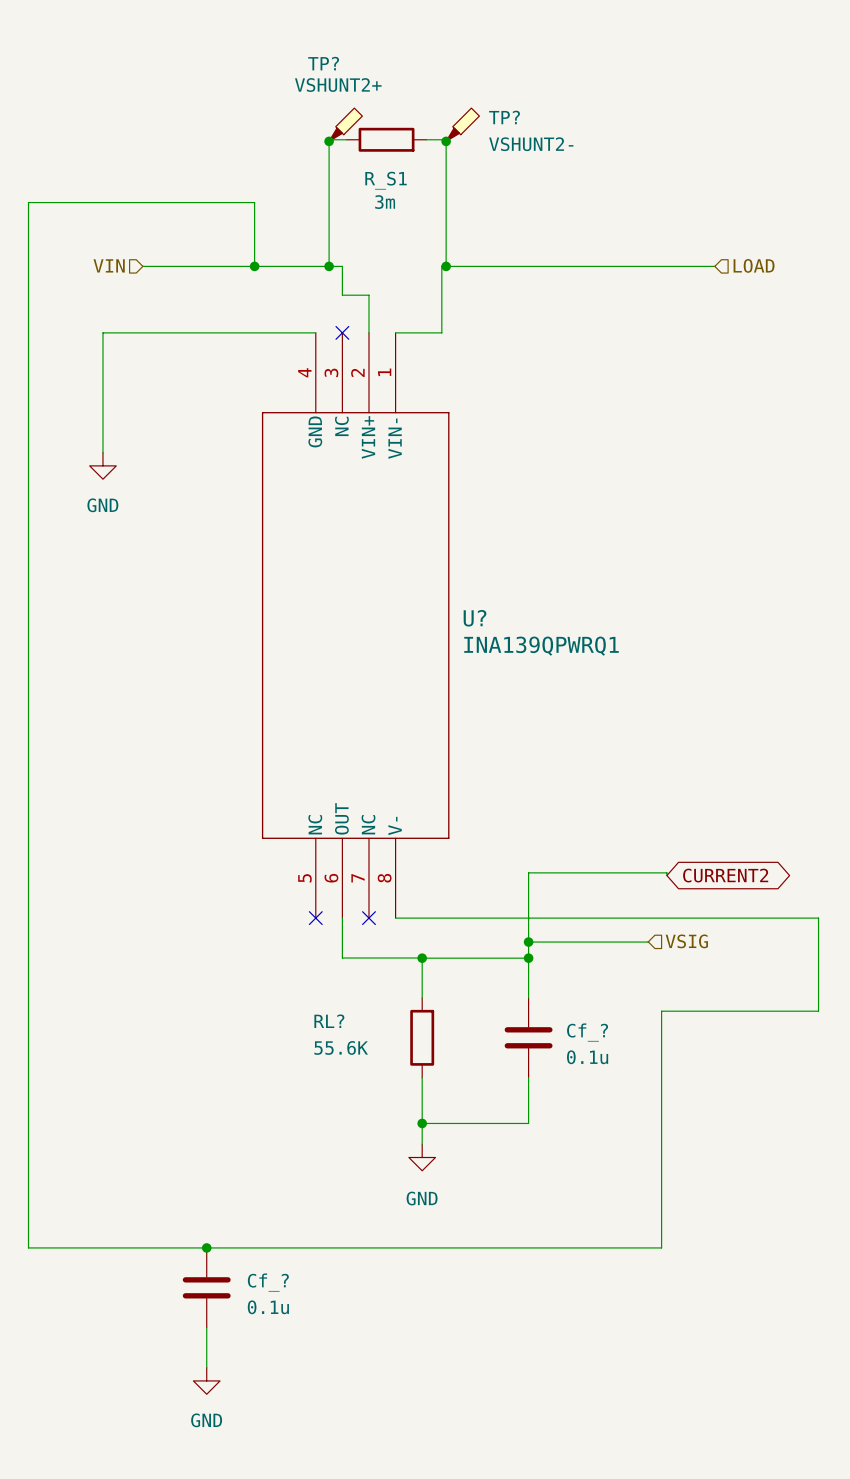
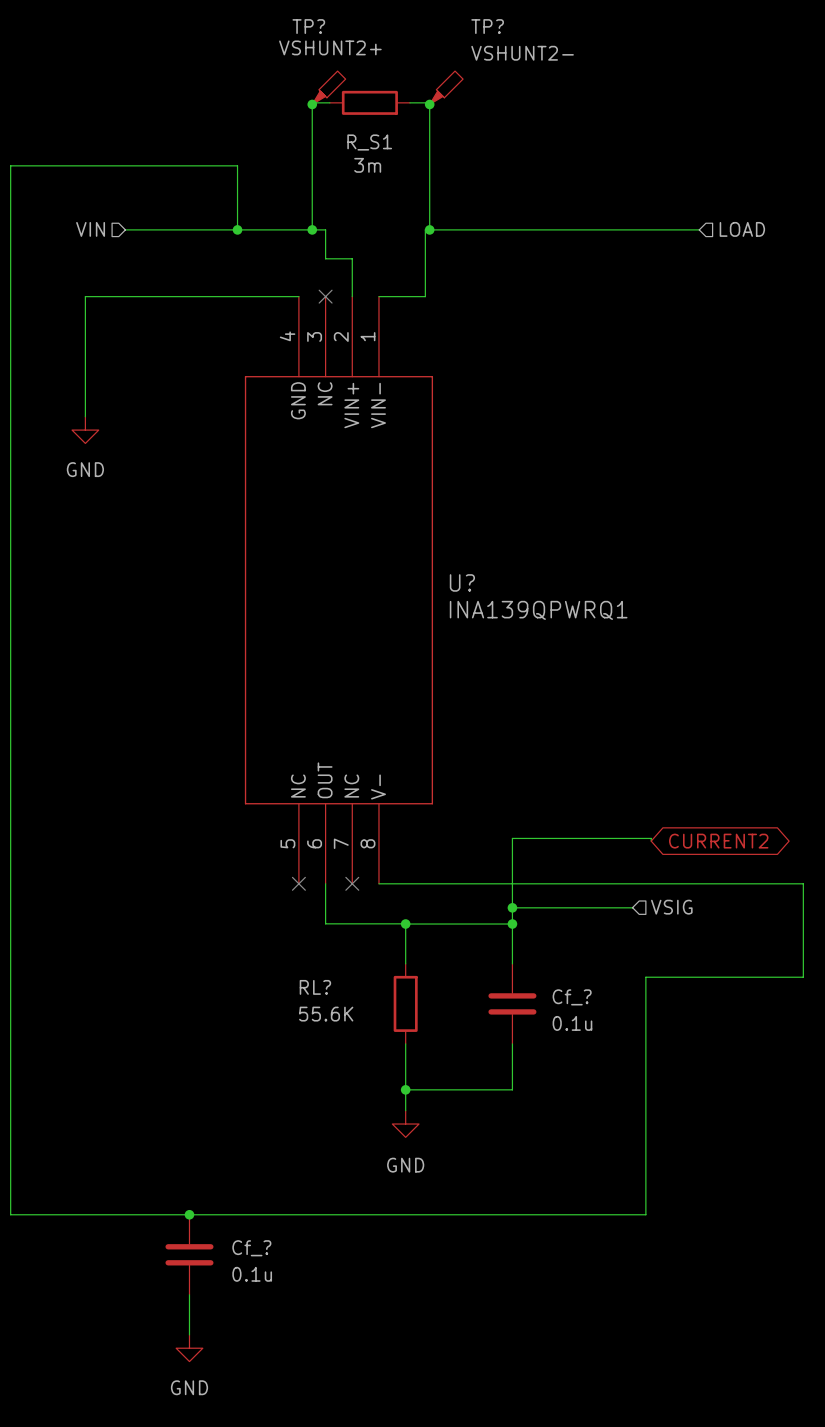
TP? name position: TP? (504, 117) -> TP? (487, 26)
TP? value position: VSHUNT2- (531, 144) -> VSHUNT2- (522, 53)

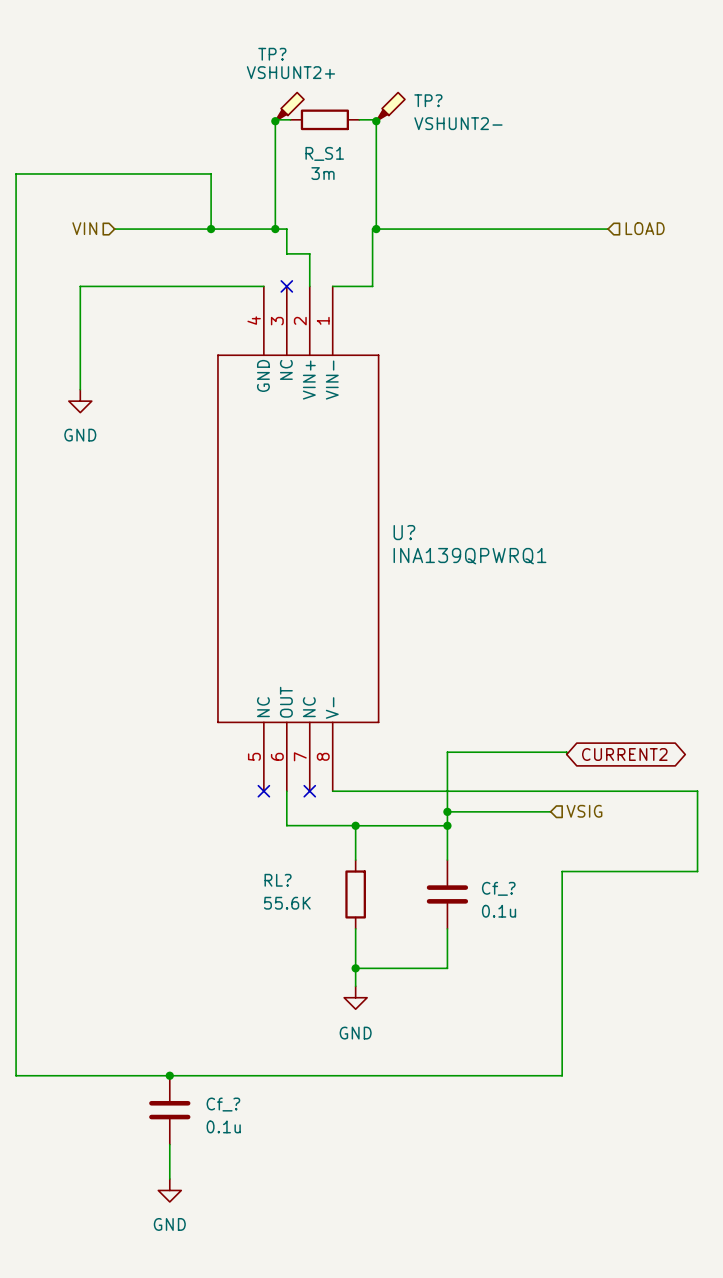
TP? name position: TP? (487, 26) -> TP? (428, 100)
TP? value position: VSHUNT2- (522, 53) -> VSHUNT2- (458, 123)

